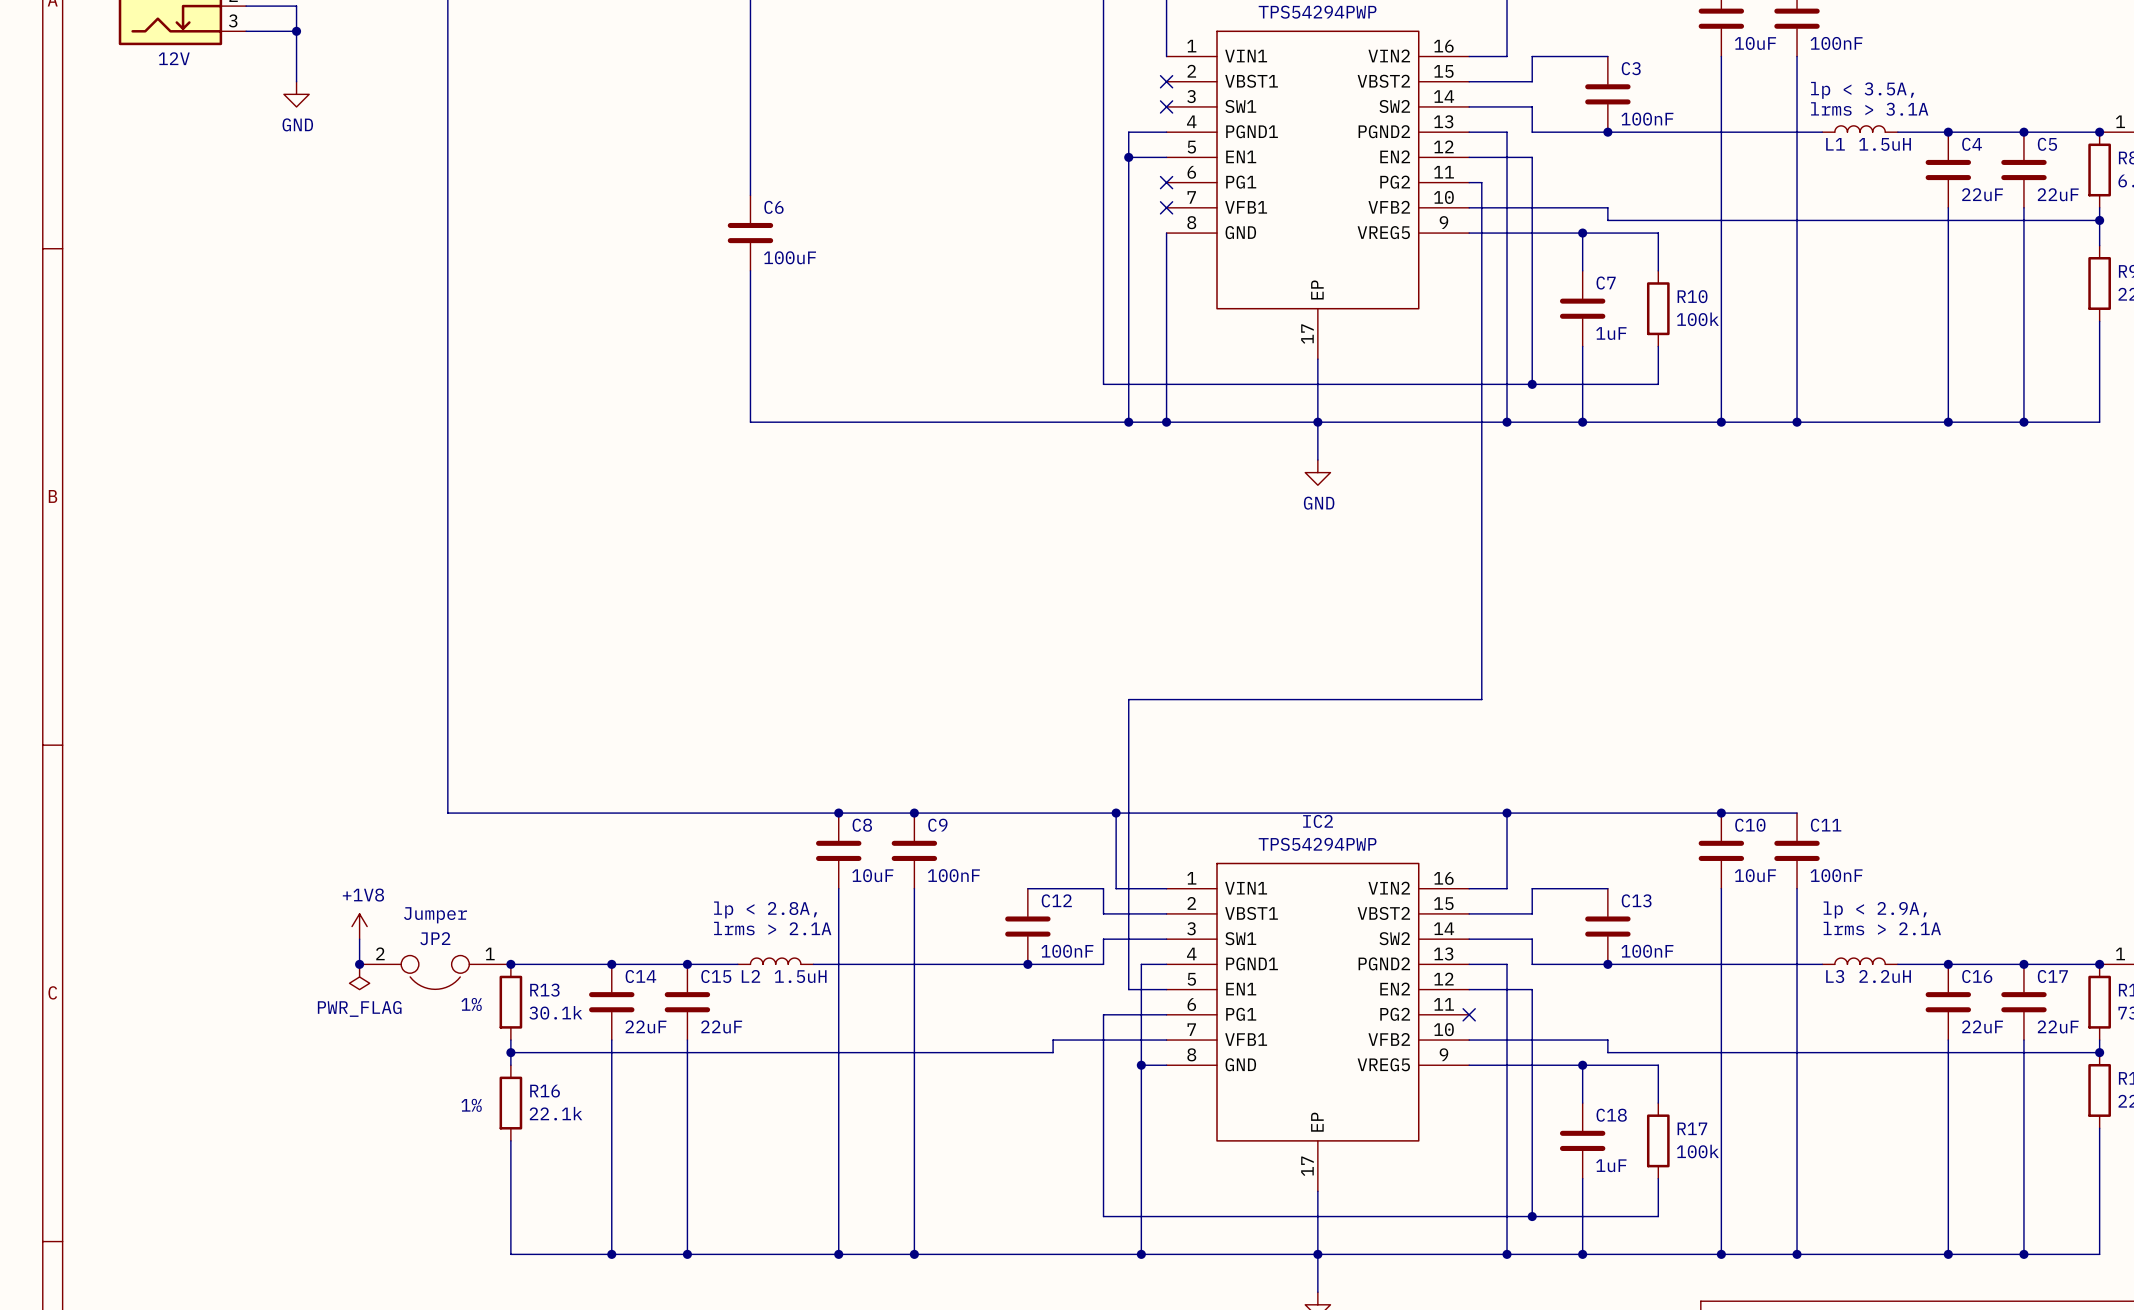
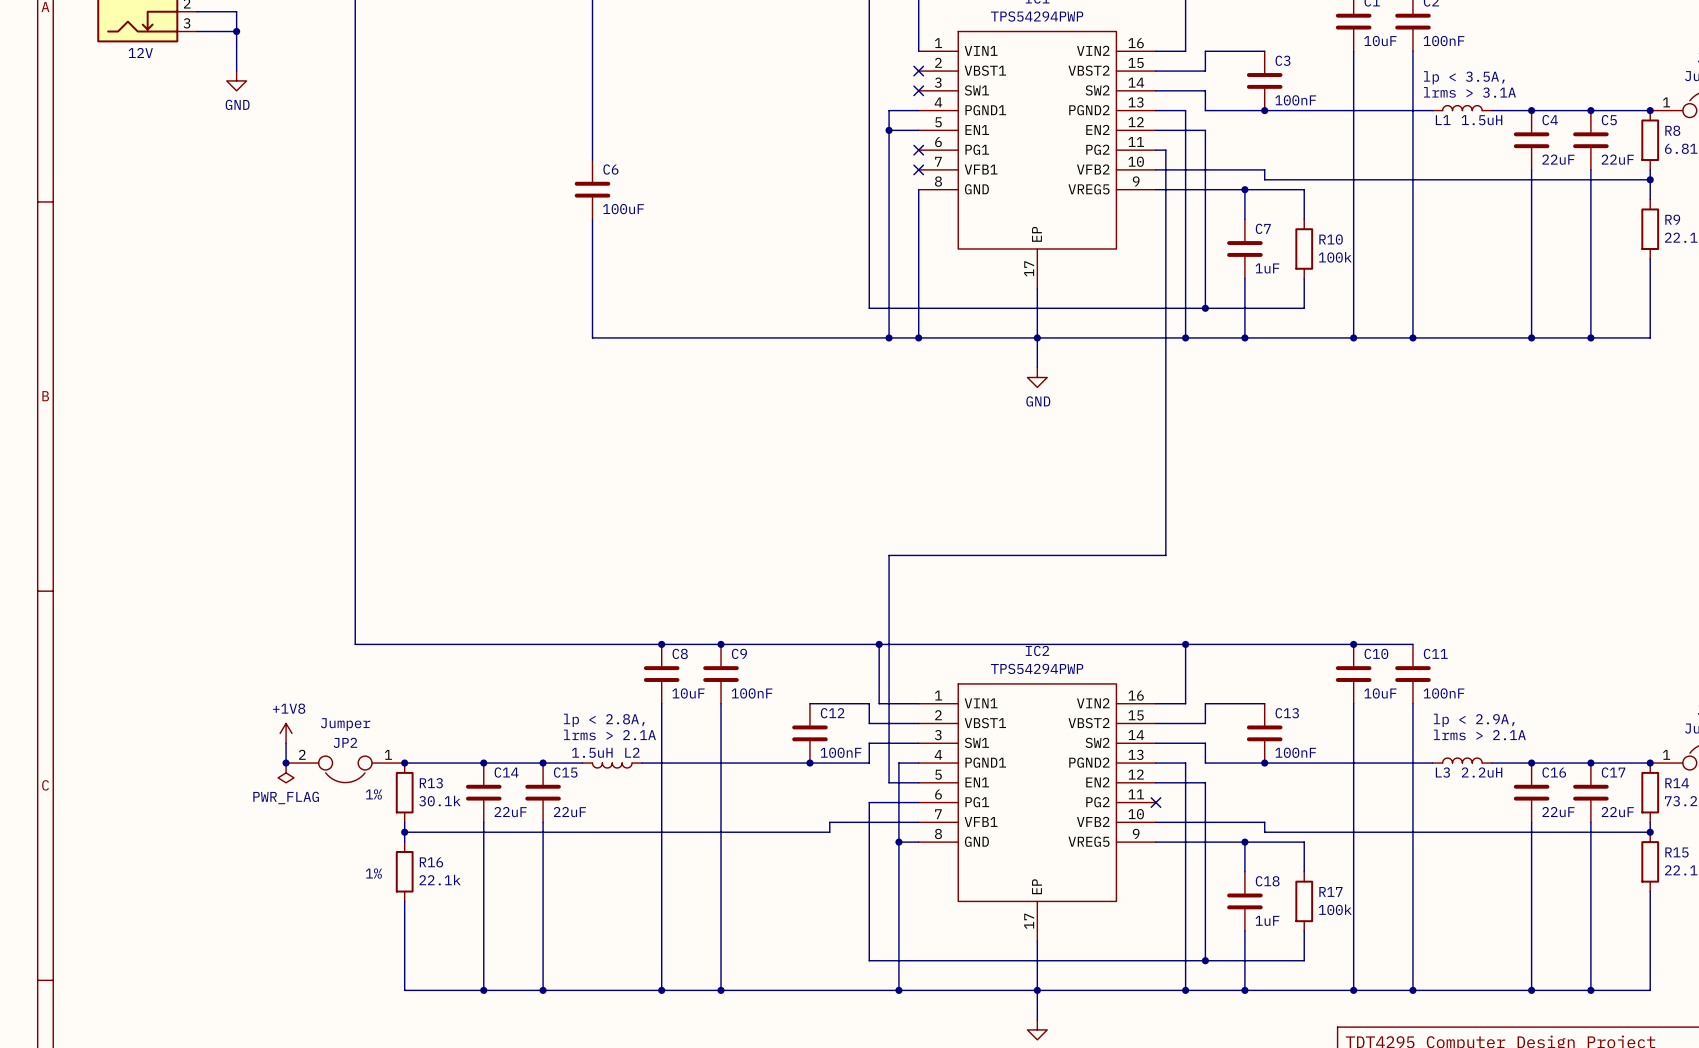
L2 rotation: 0° (775, 961) -> 180° (612, 765)

